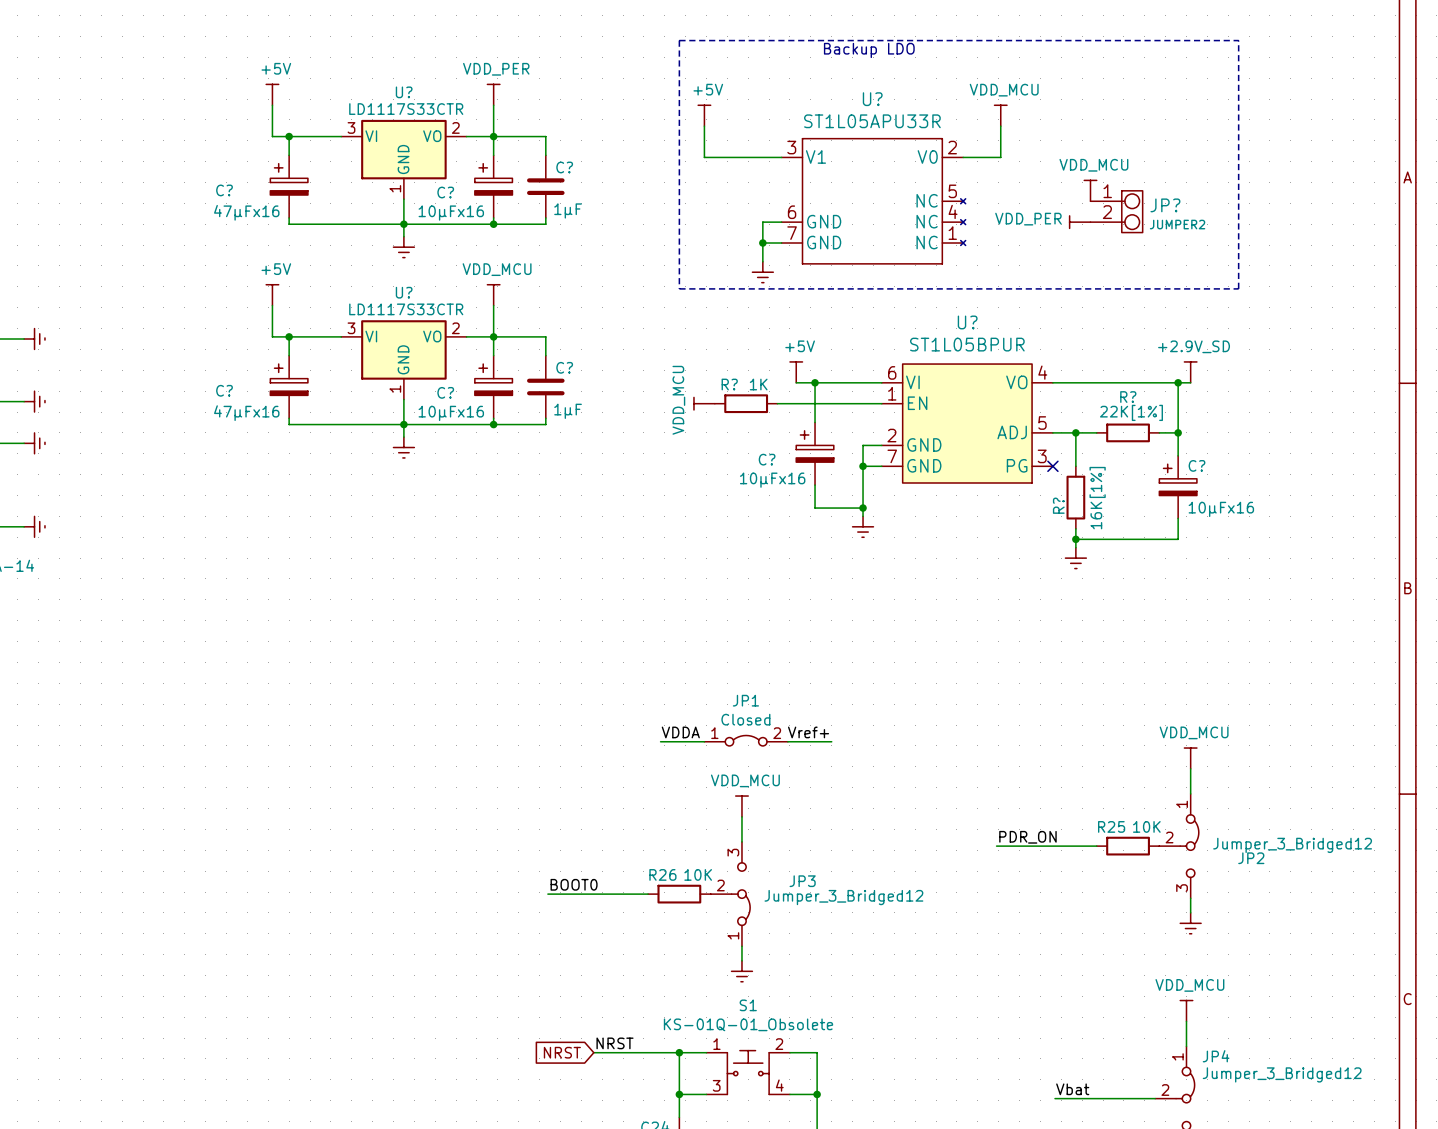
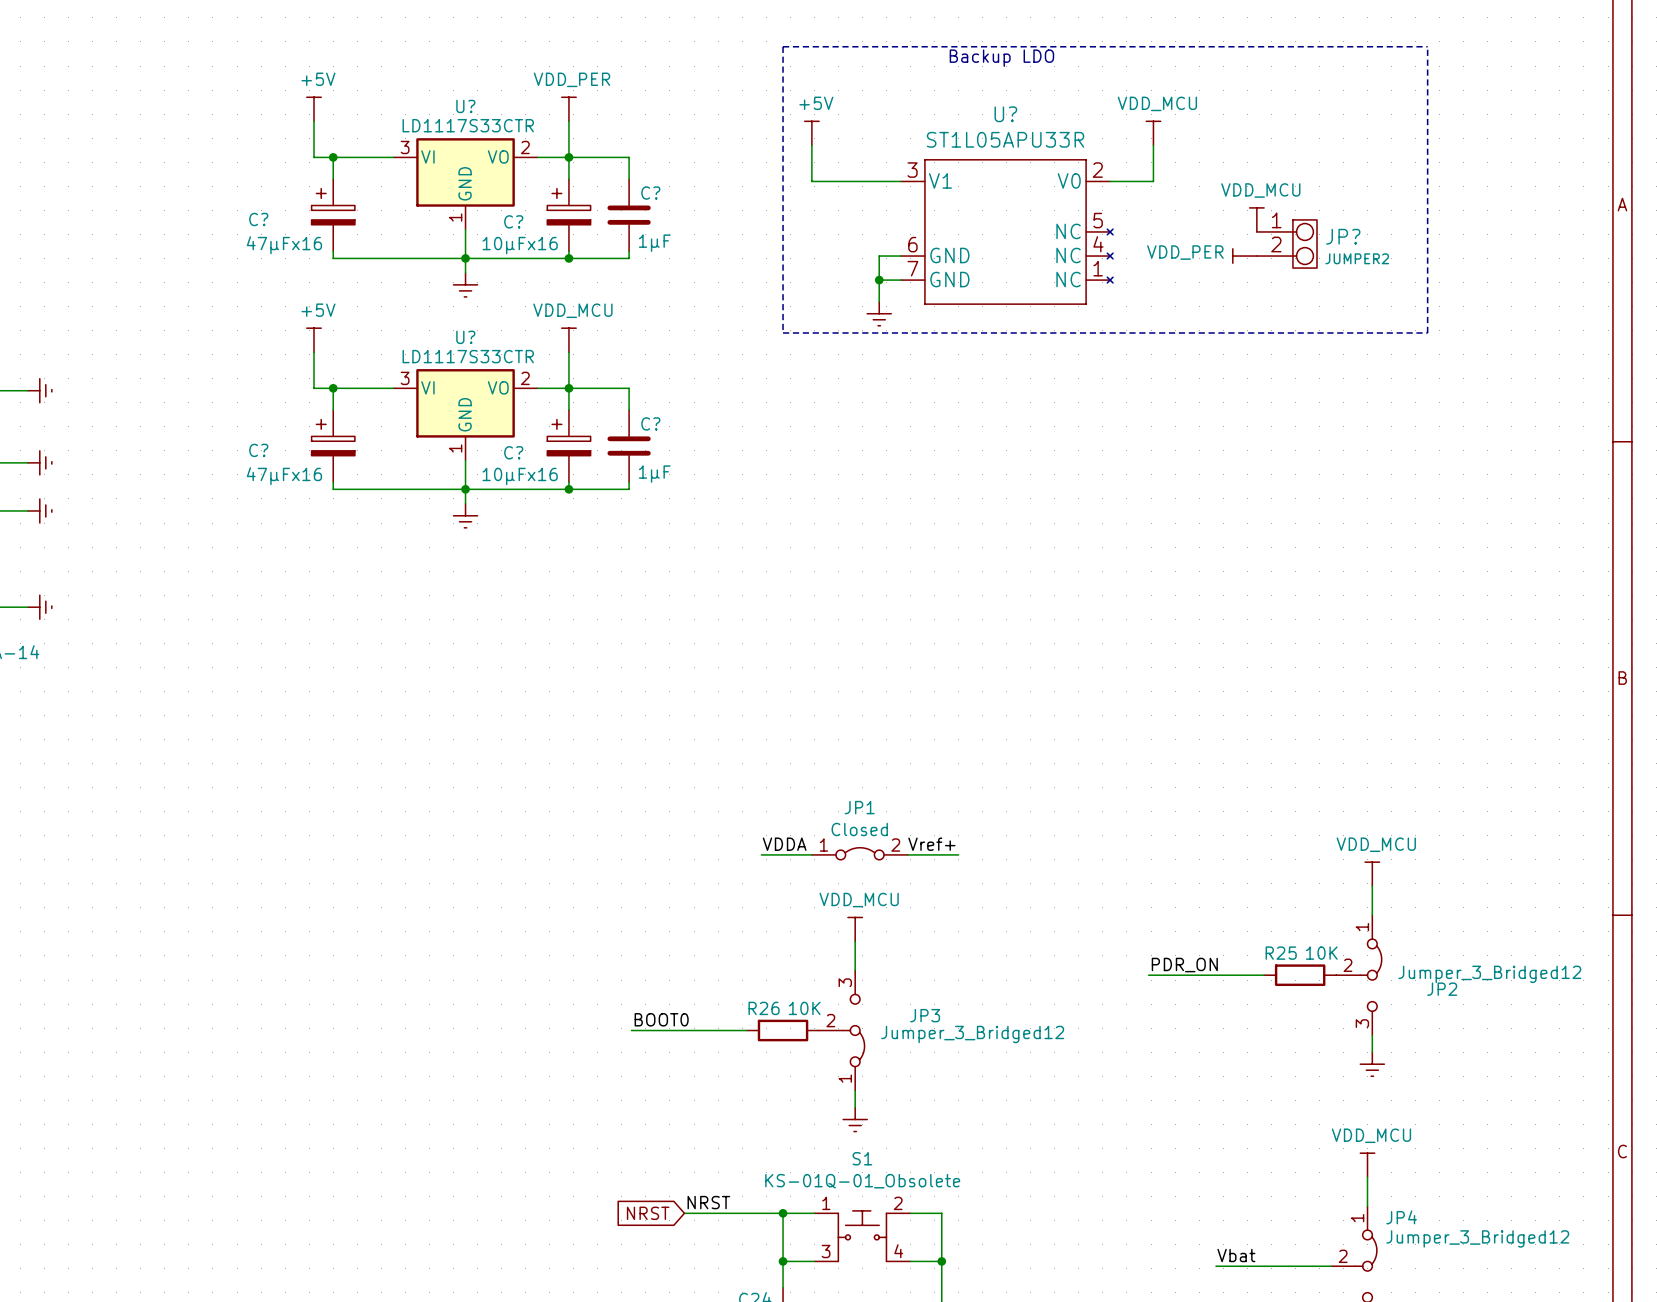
power symbol: +5V (796, 372) -> none
power symbol: +2.9V_SD (1190, 372) -> none
wire: (796, 382) (881, 382) -> none
wire: (815, 382) (815, 422) -> none
junction: (815, 382) -> none
wire: (1052, 382) (1190, 382) -> none
wire: (1178, 382) (1178, 455) -> none
junction: (1178, 382) -> none
power symbol: VDD_MCU (704, 403) -> none
R?: 1K (746, 403) -> none
wire: (777, 403) (881, 403) -> none
U?: ST1L05BPUR (967, 423) -> none
wire: (1052, 432) (1096, 432) -> none
wire: (1075, 432) (1075, 466) -> none
junction: (1075, 432) -> none
R?: 22K[1%] (1128, 432) -> none
wire: (1159, 432) (1178, 432) -> none
junction: (1178, 432) -> none
wire: (881, 445) (863, 445) (863, 516) -> none
C?: 10µFx16 (815, 453) -> none
wire: (863, 466) (881, 466) -> none
junction: (863, 466) -> none
no-connect mark: (1052, 466) -> none
wire: (815, 485) (815, 508) (863, 508) -> none
C?: 10µFx16 (1178, 487) -> none
R?: 16K[1%] (1075, 497) -> none
junction: (863, 508) -> none
wire: (1178, 518) (1178, 539) (1075, 539) -> none
power symbol: (863, 526) -> none
wire: (1075, 528) (1075, 547) -> none
junction: (1075, 539) -> none
power symbol: (1075, 558) -> none

